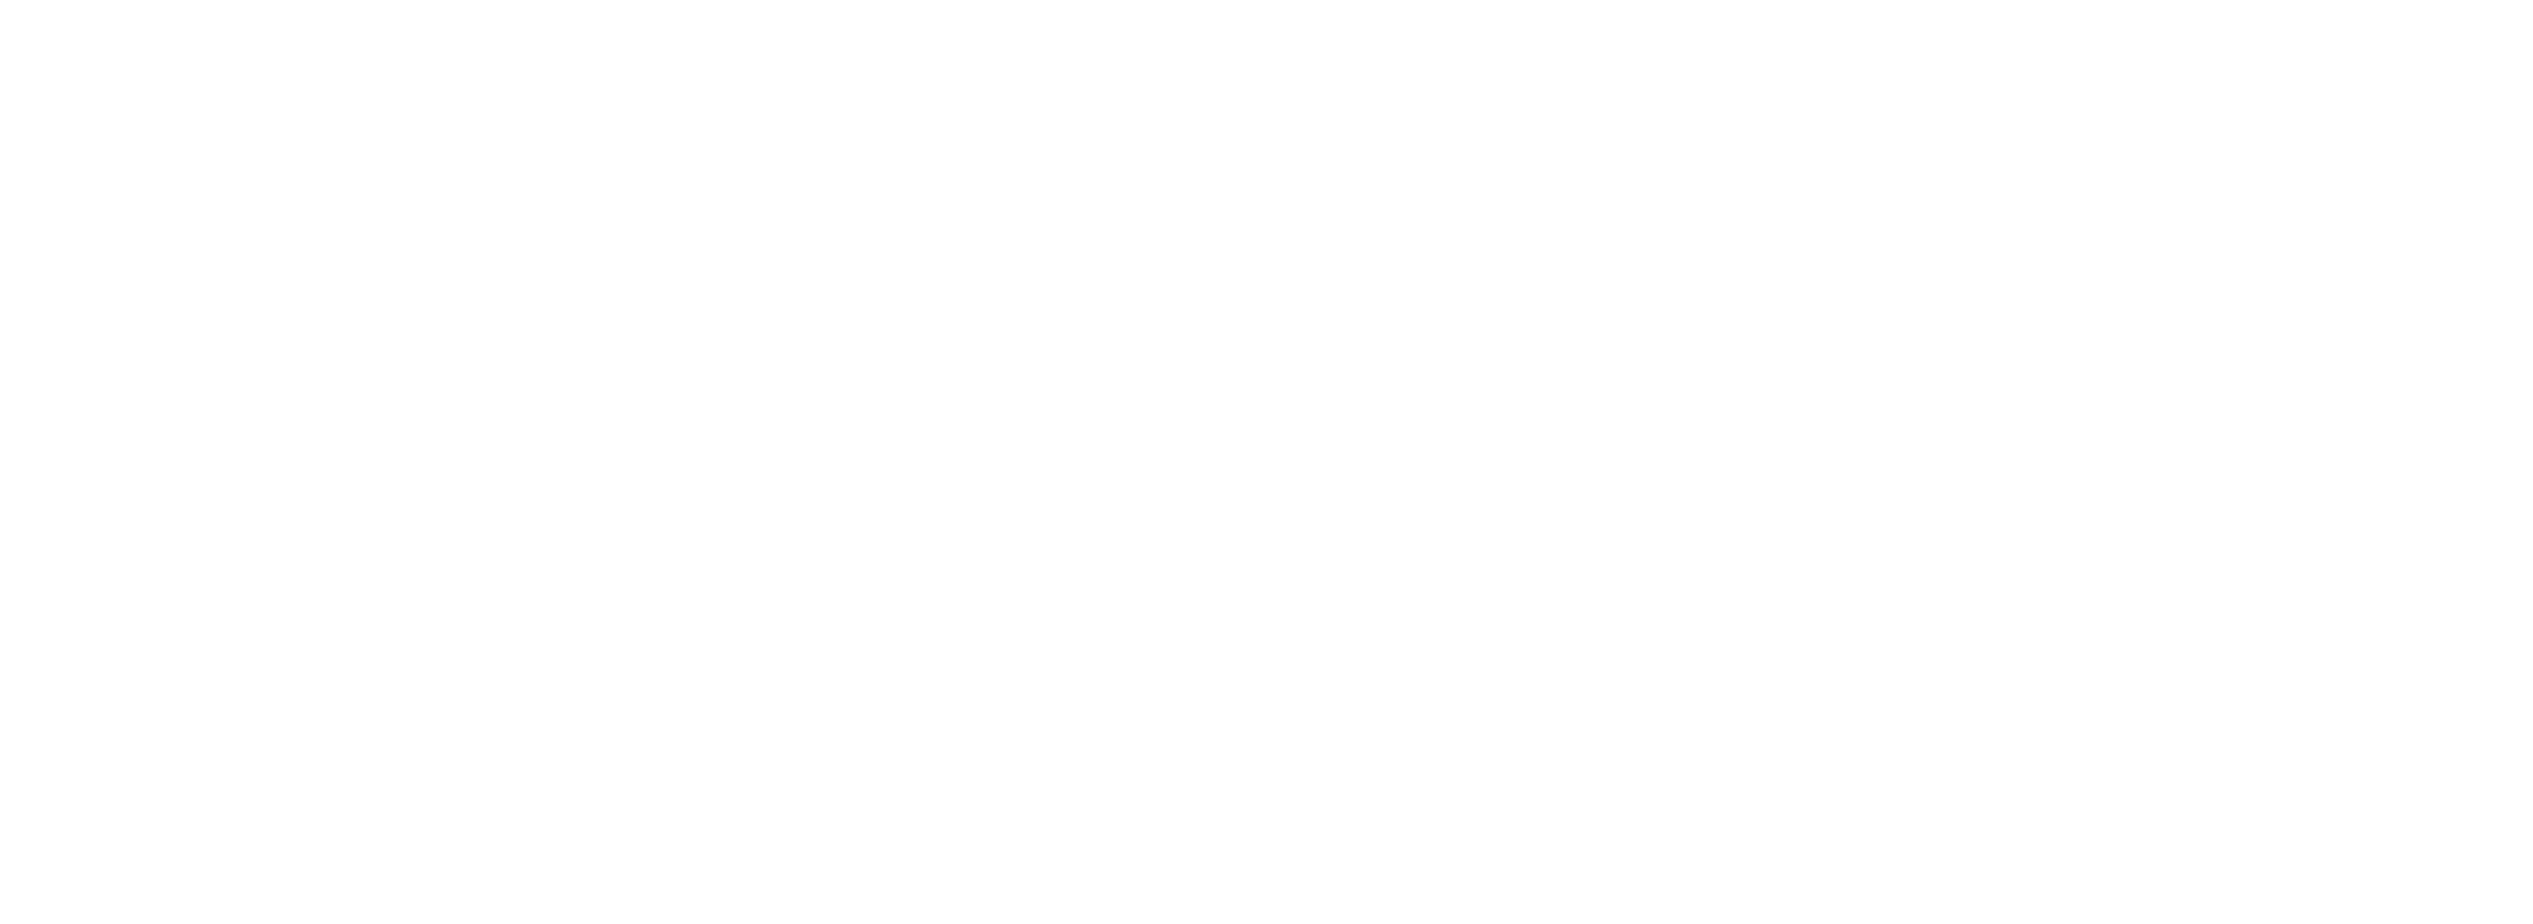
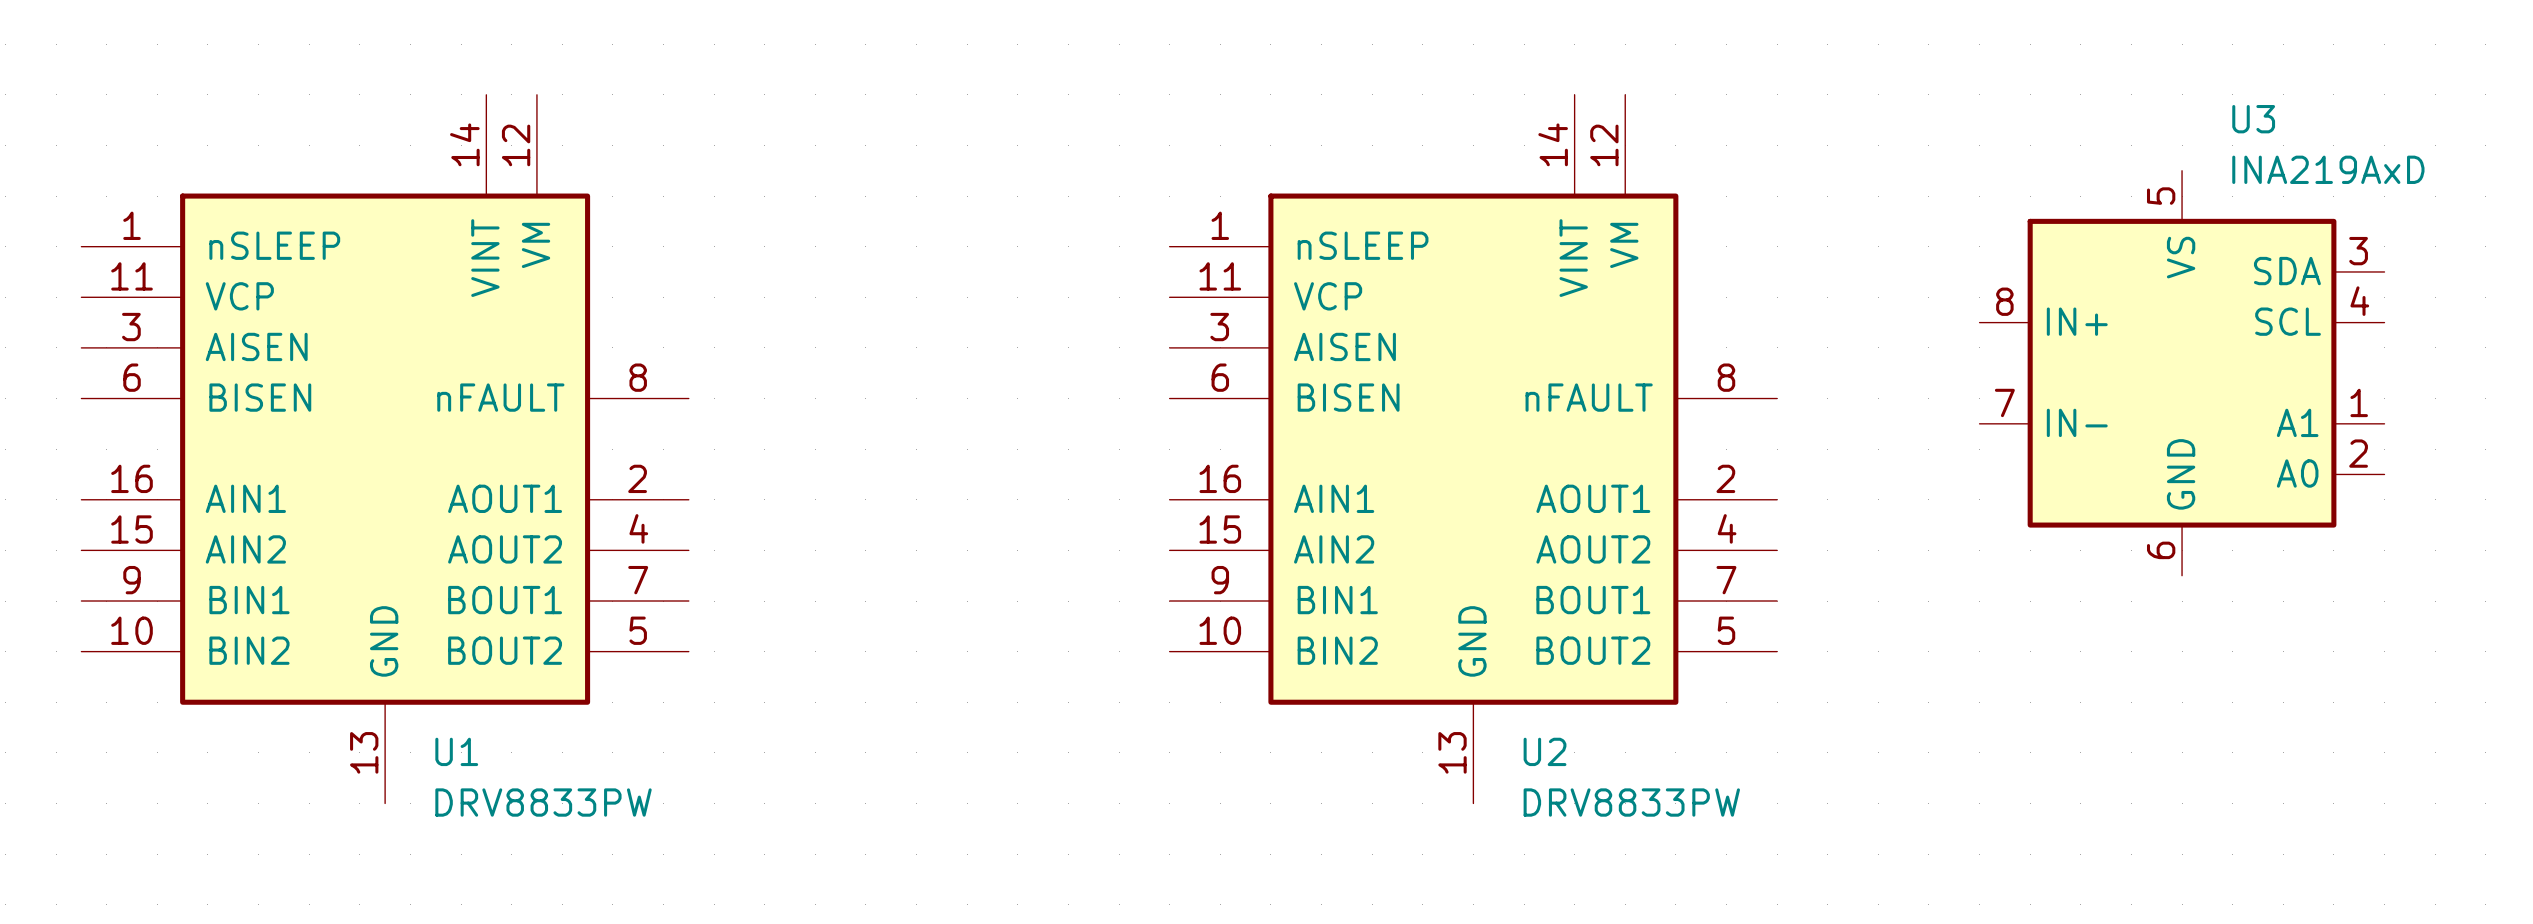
U3: none -> INA219AxD (2182, 373)
U1: none -> DRV8833PW (385, 449)
U2: none -> DRV8833PW (1473, 449)

